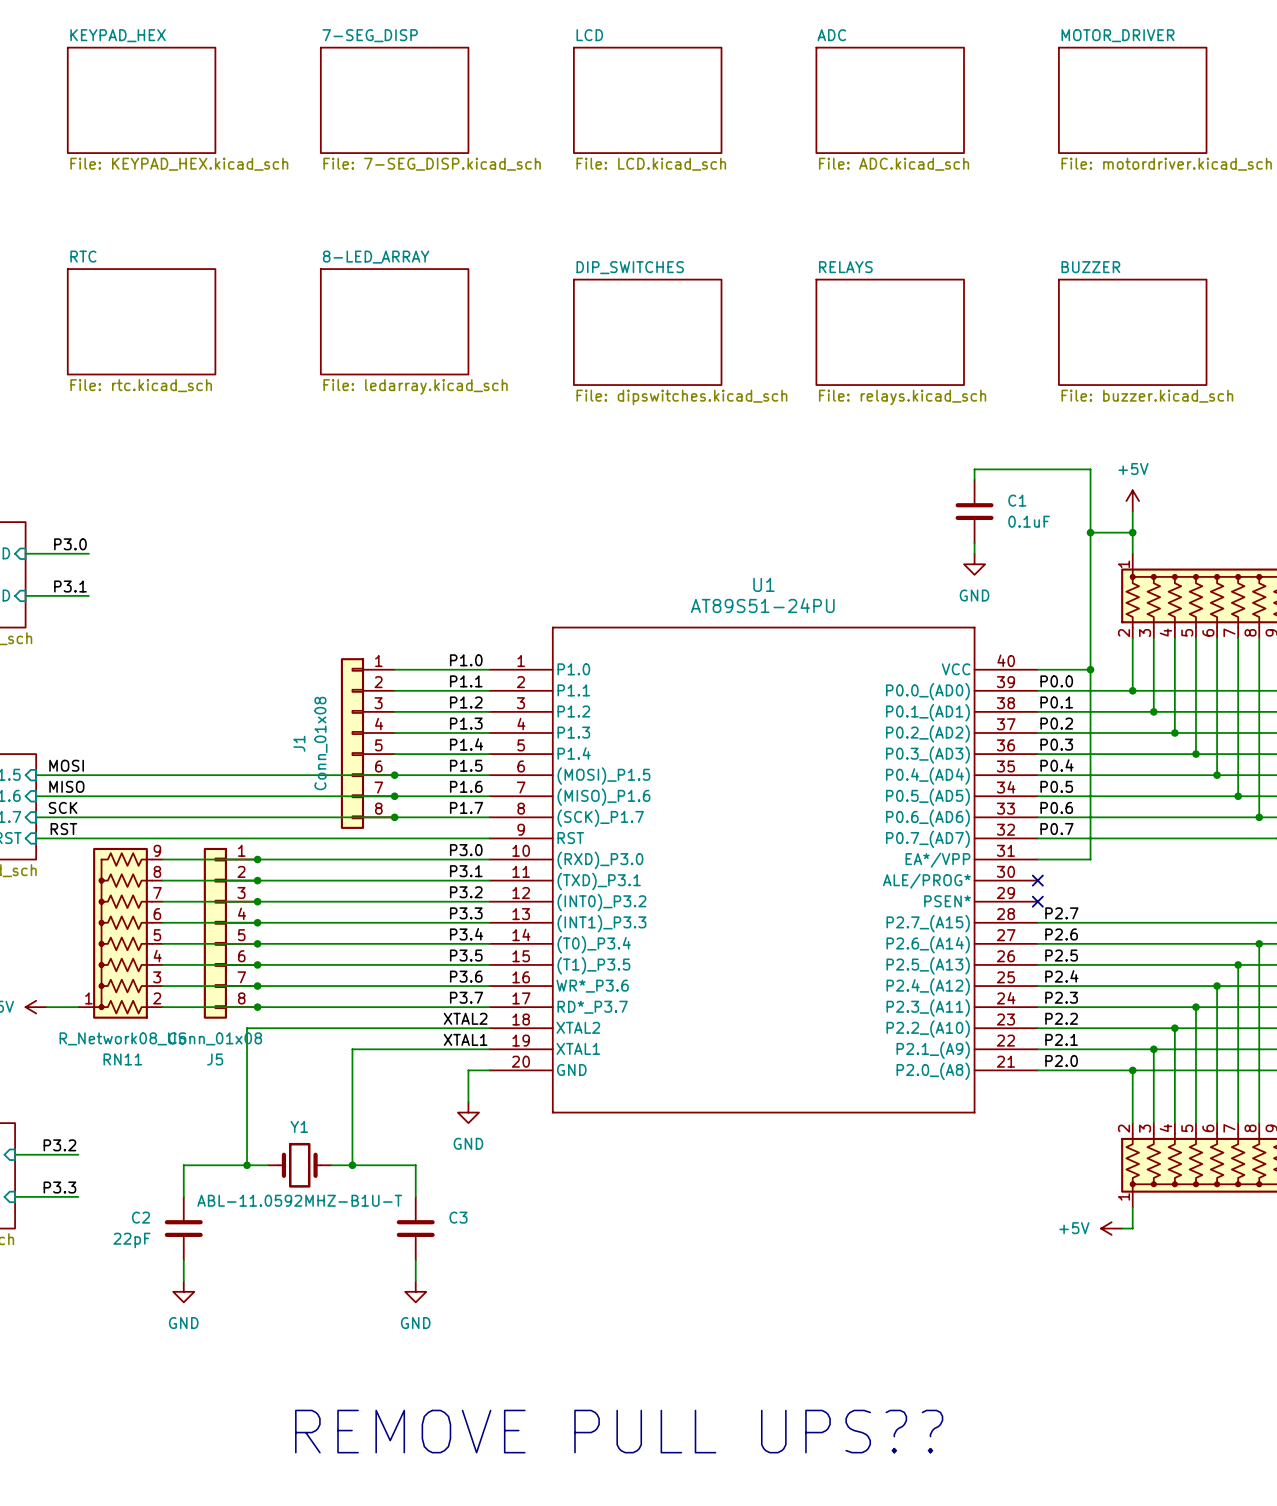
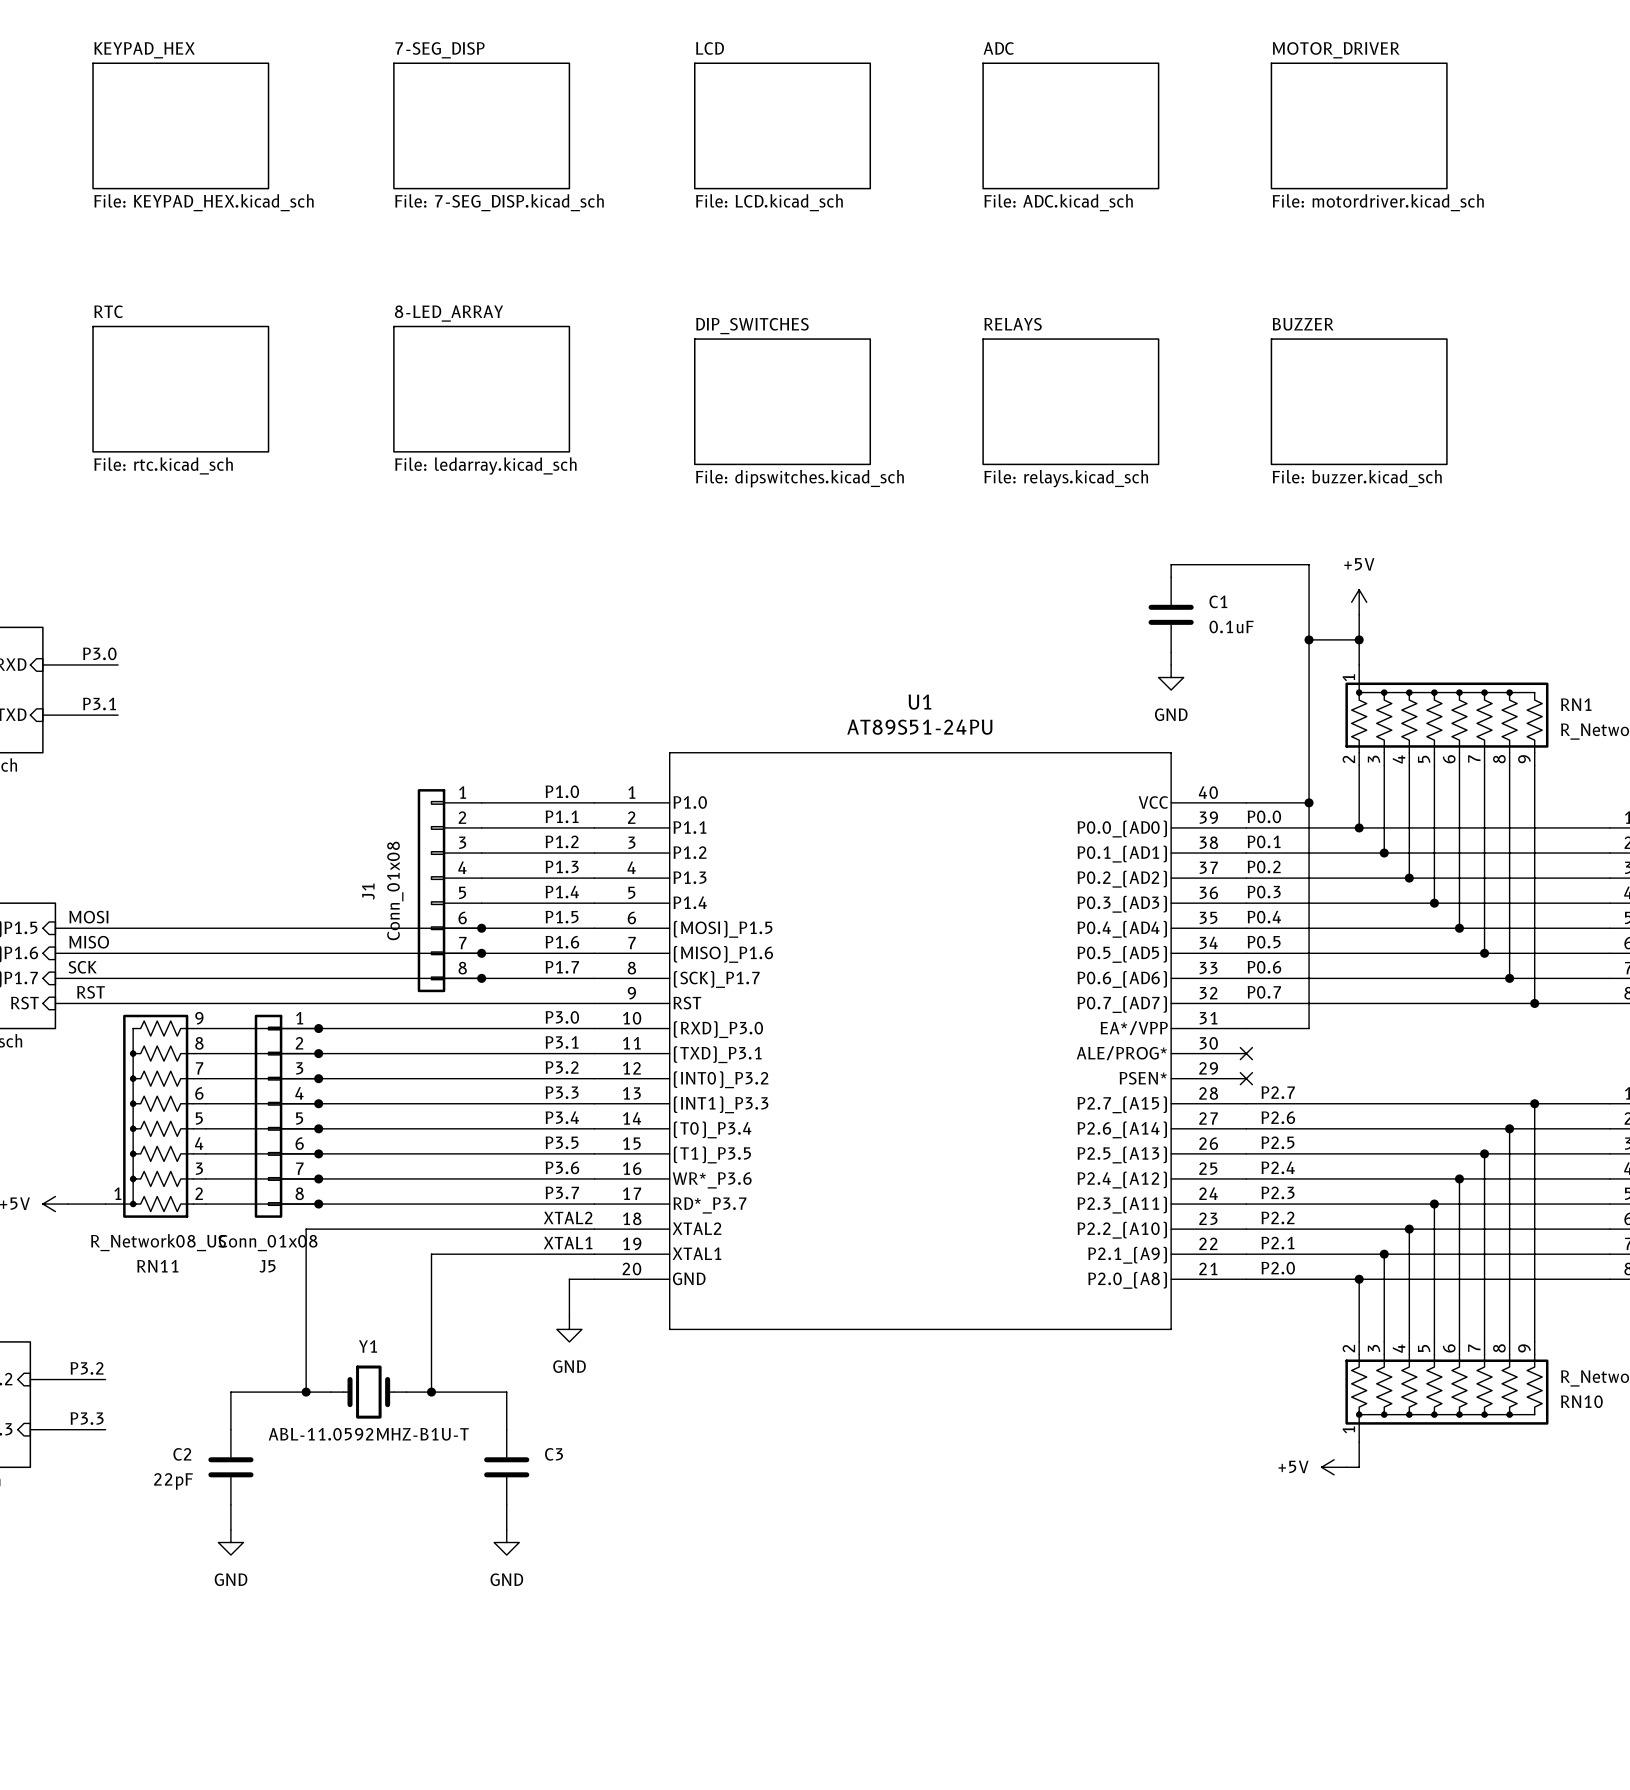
text: REMOVE PULL UPS?? (619, 1431) -> none

